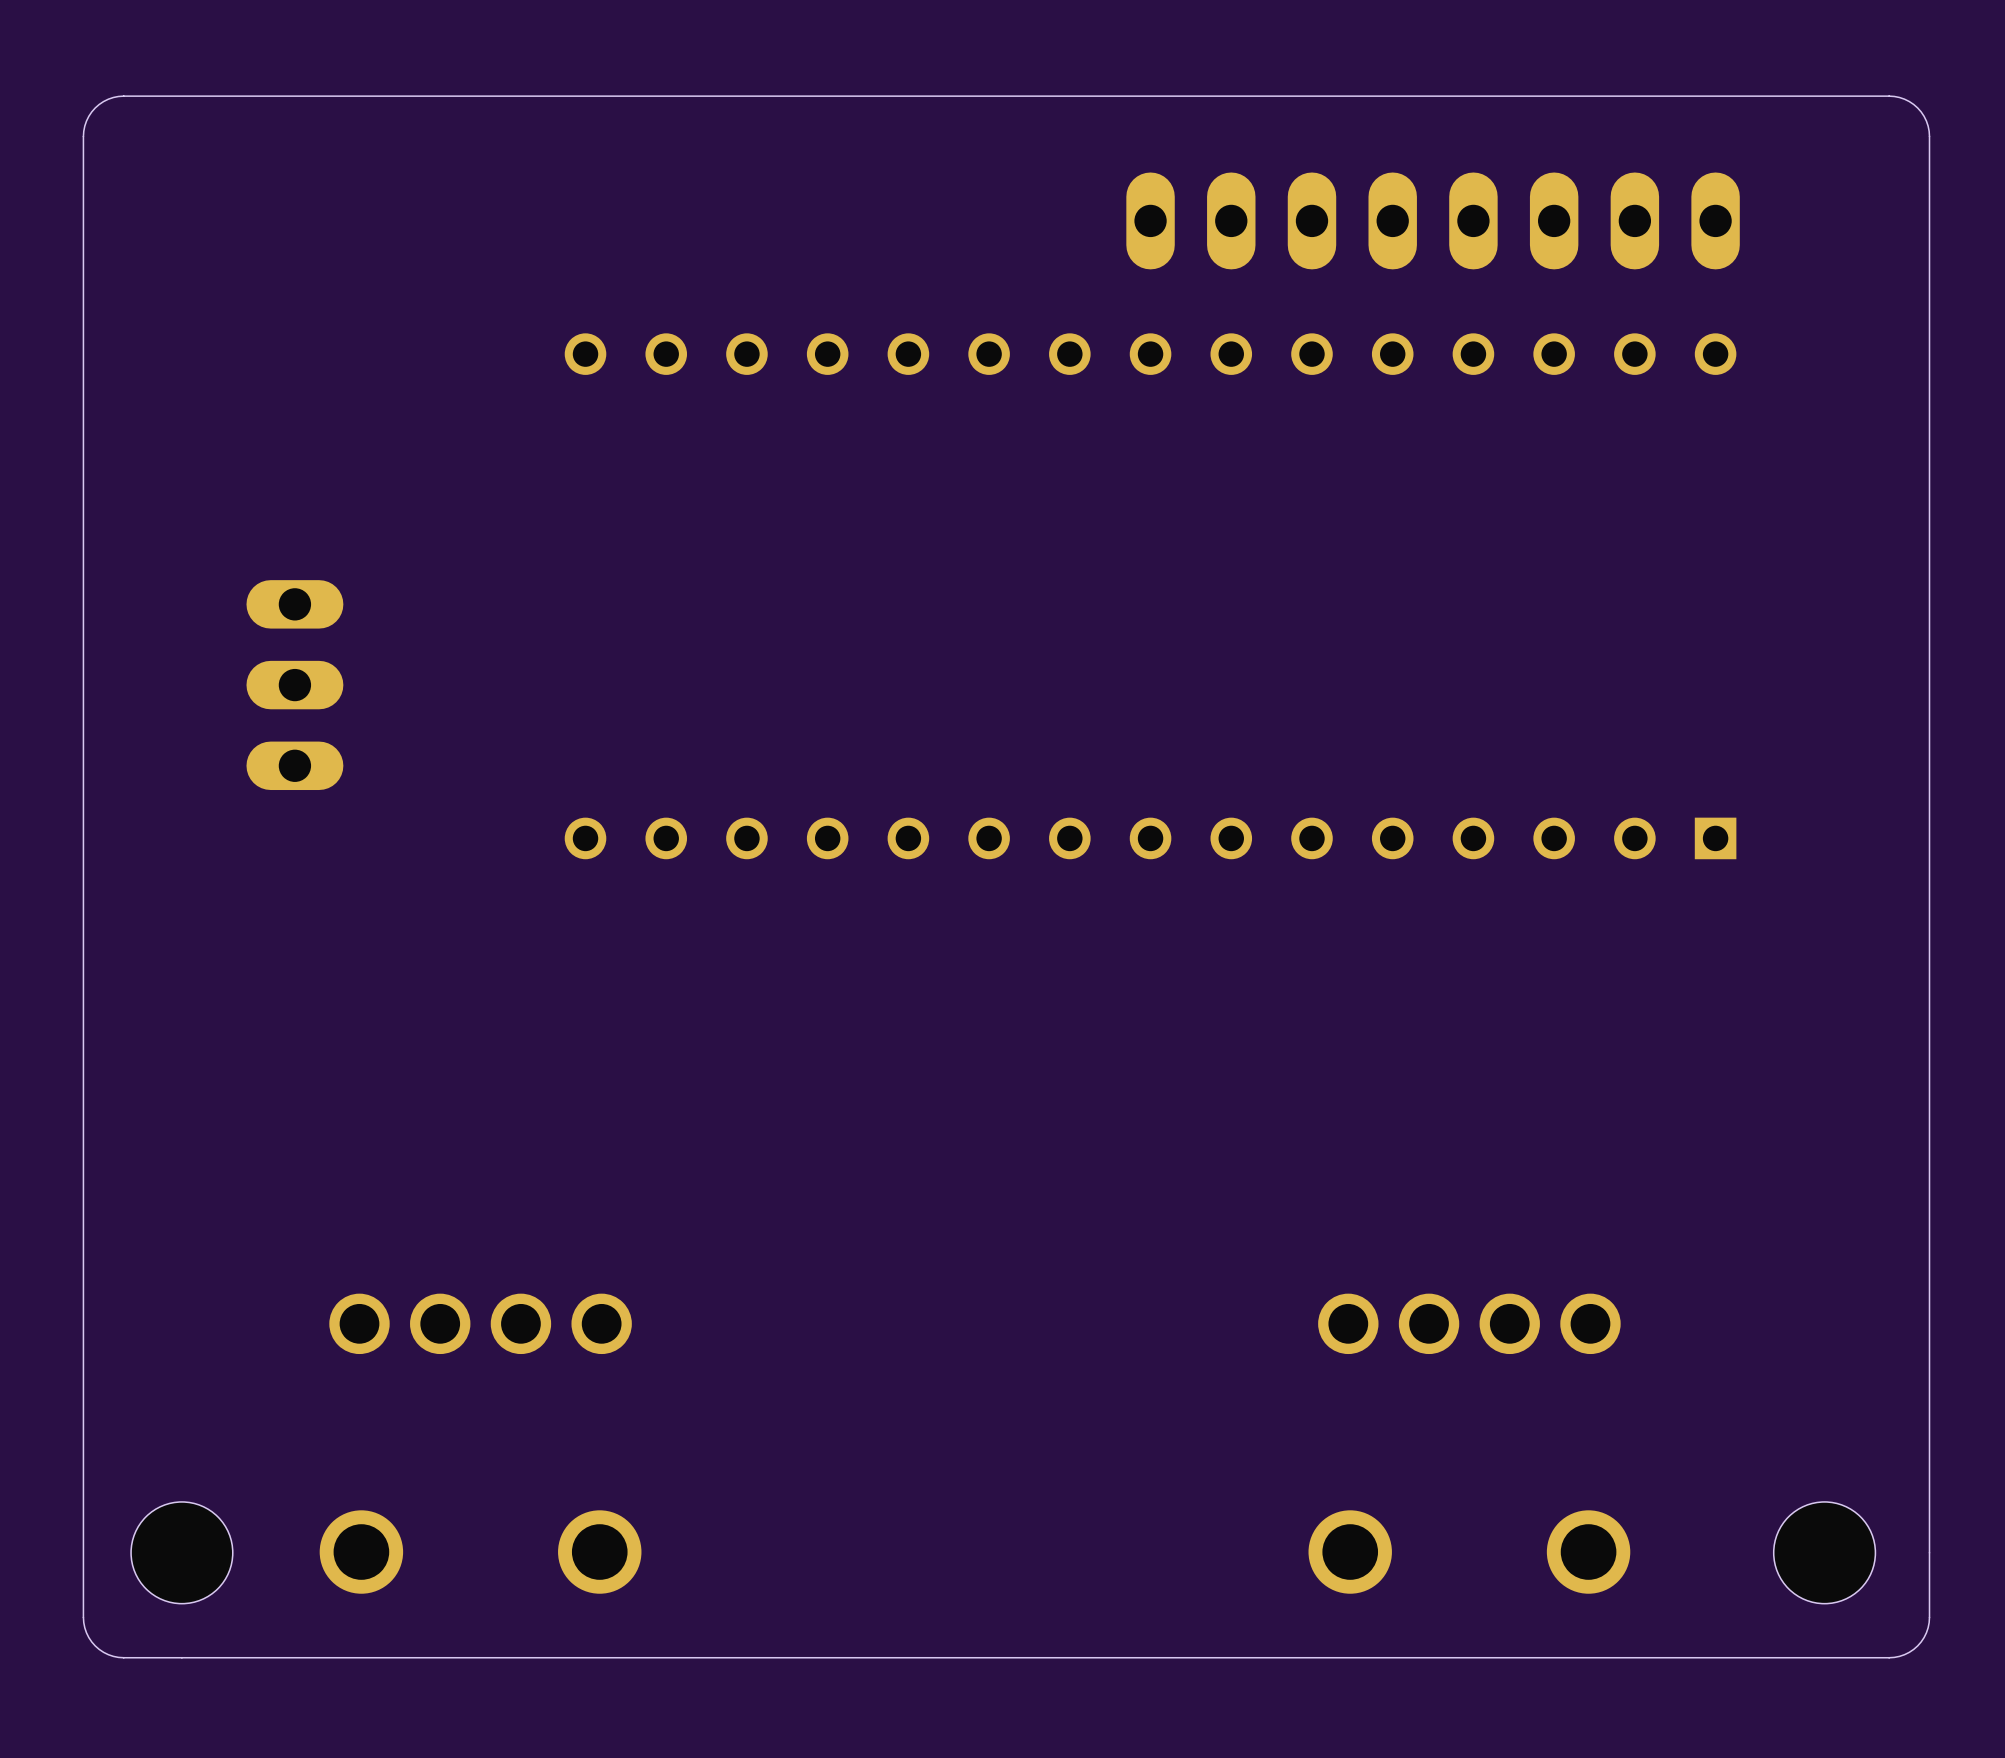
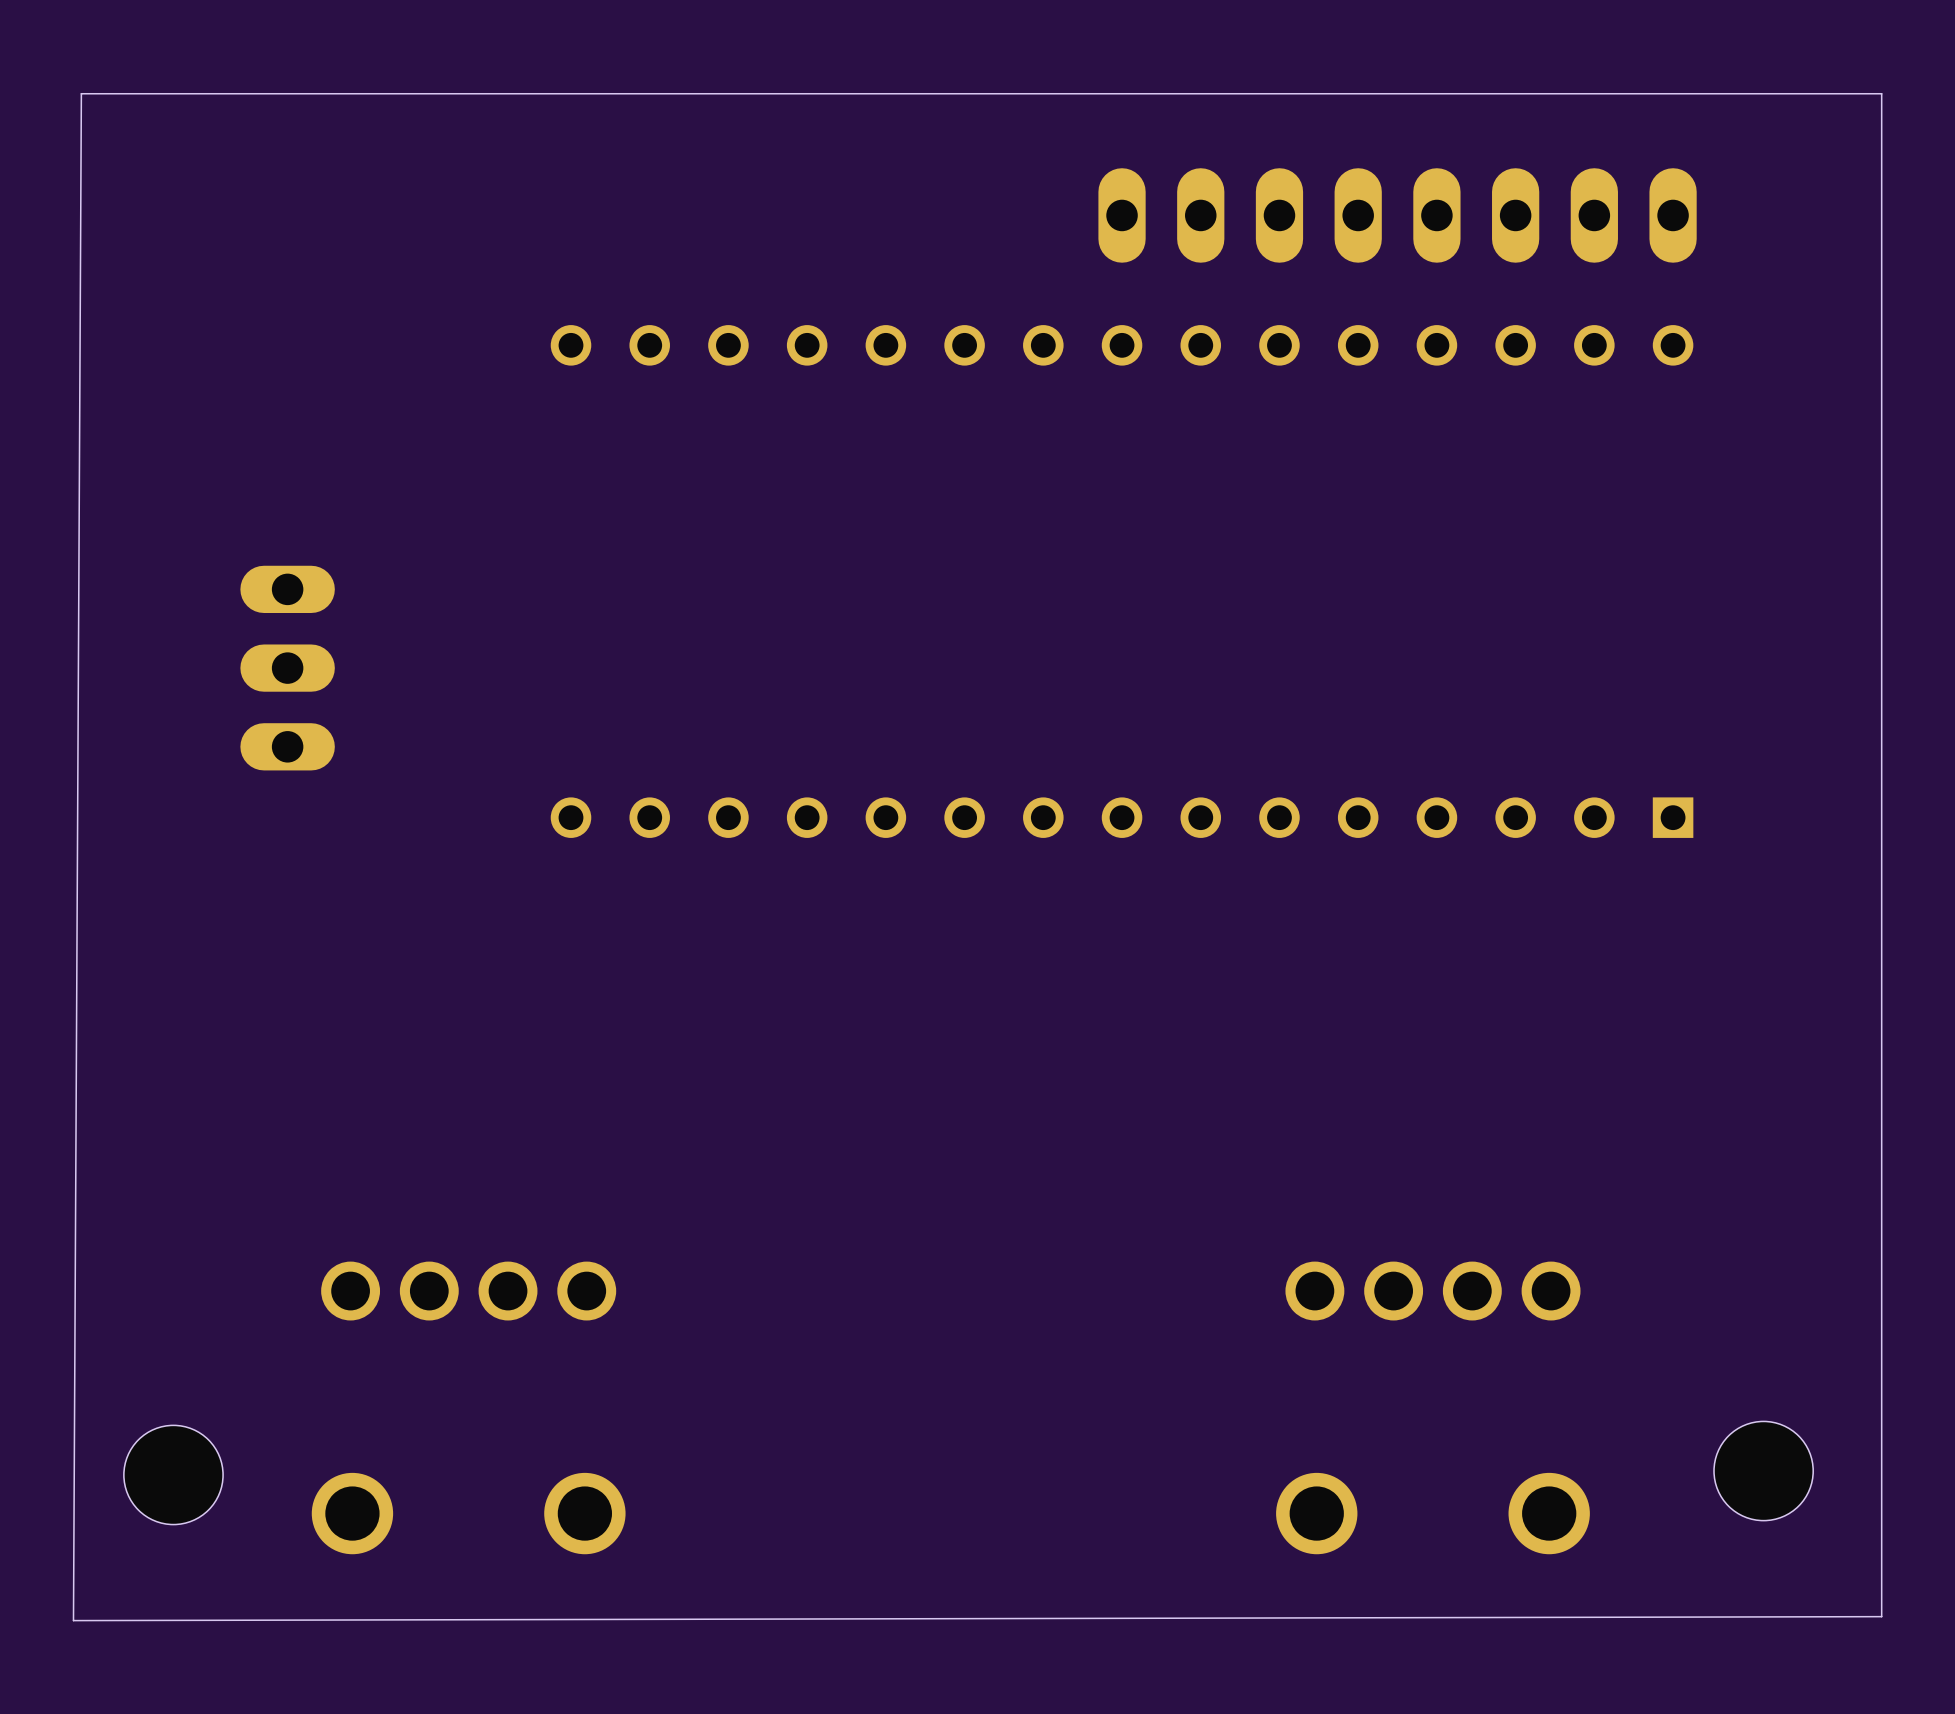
board edge: (123, 96) (108, 99) (95, 107) (86, 121) (83, 136) (83, 1617) (88, 1637) (99, 1649) (113, 1656) (123, 1657) (1889, 1657) (1904, 1654) (1917, 1645) (1926, 1632) (1929, 1617) -> (120, 93) (81, 93) (73, 1620) (1881, 1616) (1881, 1577)
board edge: (1889, 96) (1904, 99) (1917, 107) (1926, 121) (1929, 136) -> (1842, 93) (1881, 93) (1881, 133)
hole position: (181, 1552) -> (173, 1474)
hole position: (1824, 1552) -> (1763, 1471)

